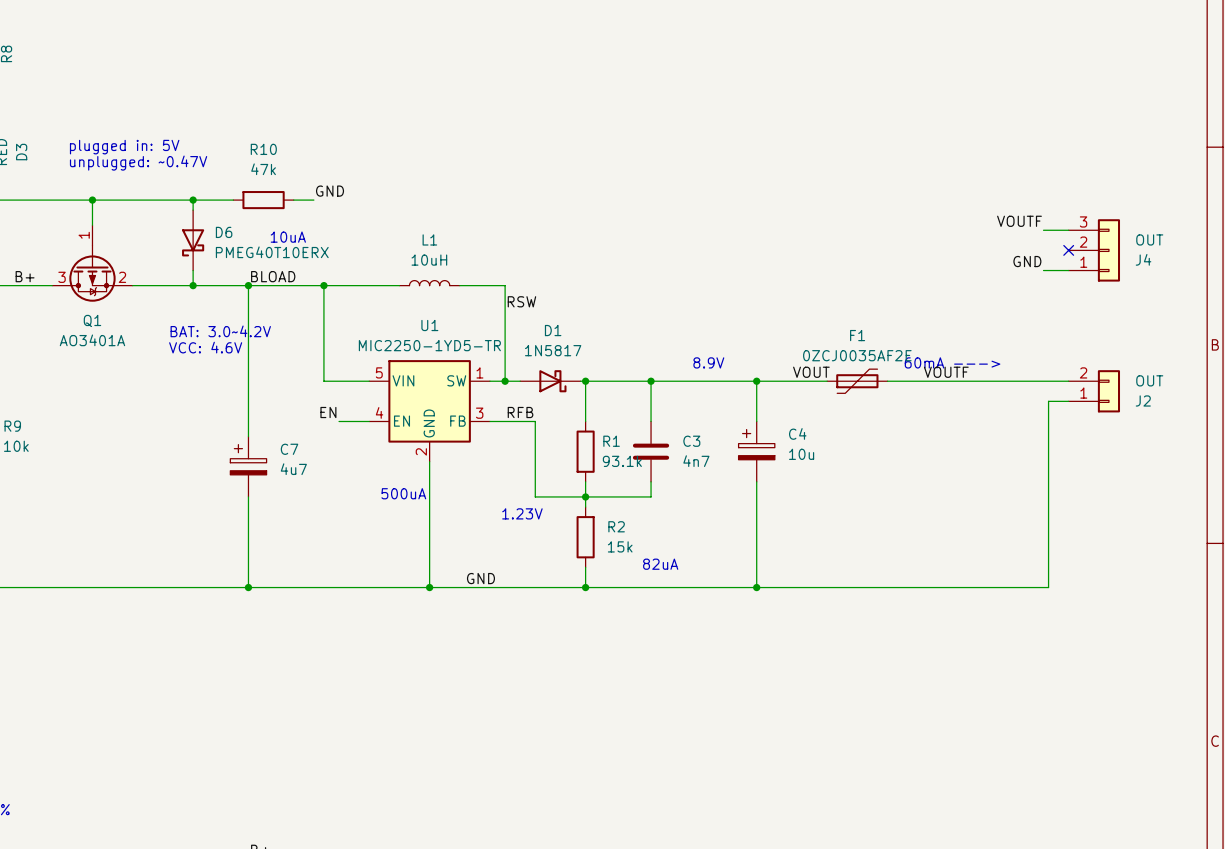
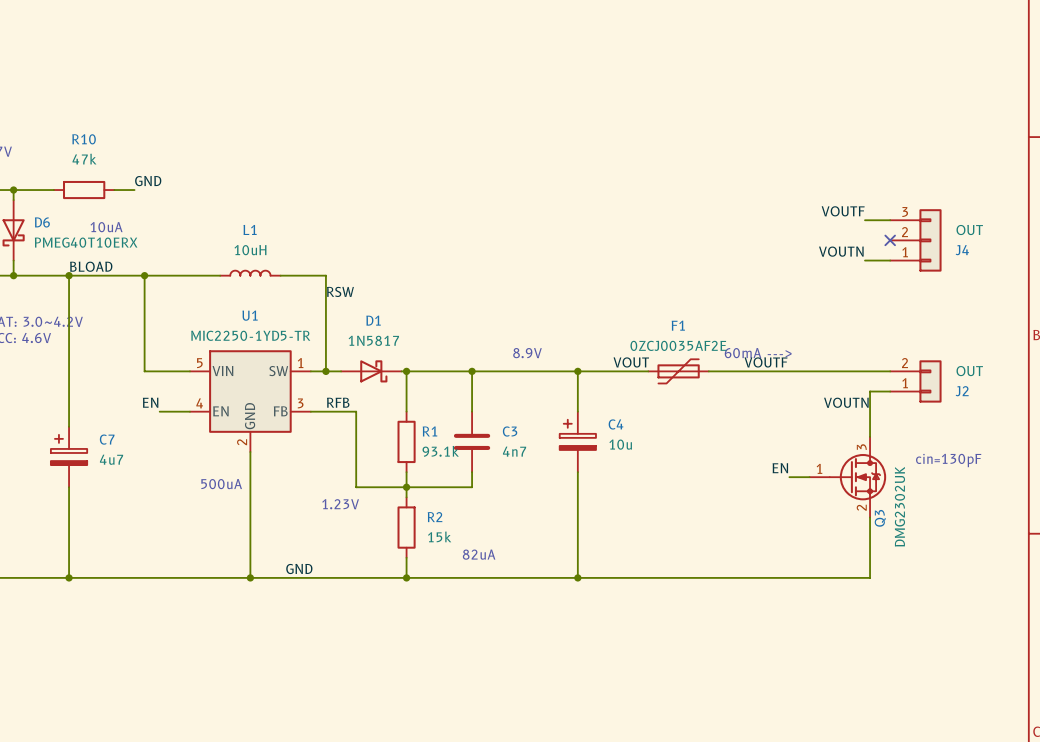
label: GND (1027, 261) -> VOUTN (841, 251)
label: none -> VOUTN (846, 402)
text: none -> cin=130pF (948, 460)
label: none -> EN (780, 468)
wire: none -> (789, 477) (809, 477)
Q3: none -> DMG2302UK (847, 477)

